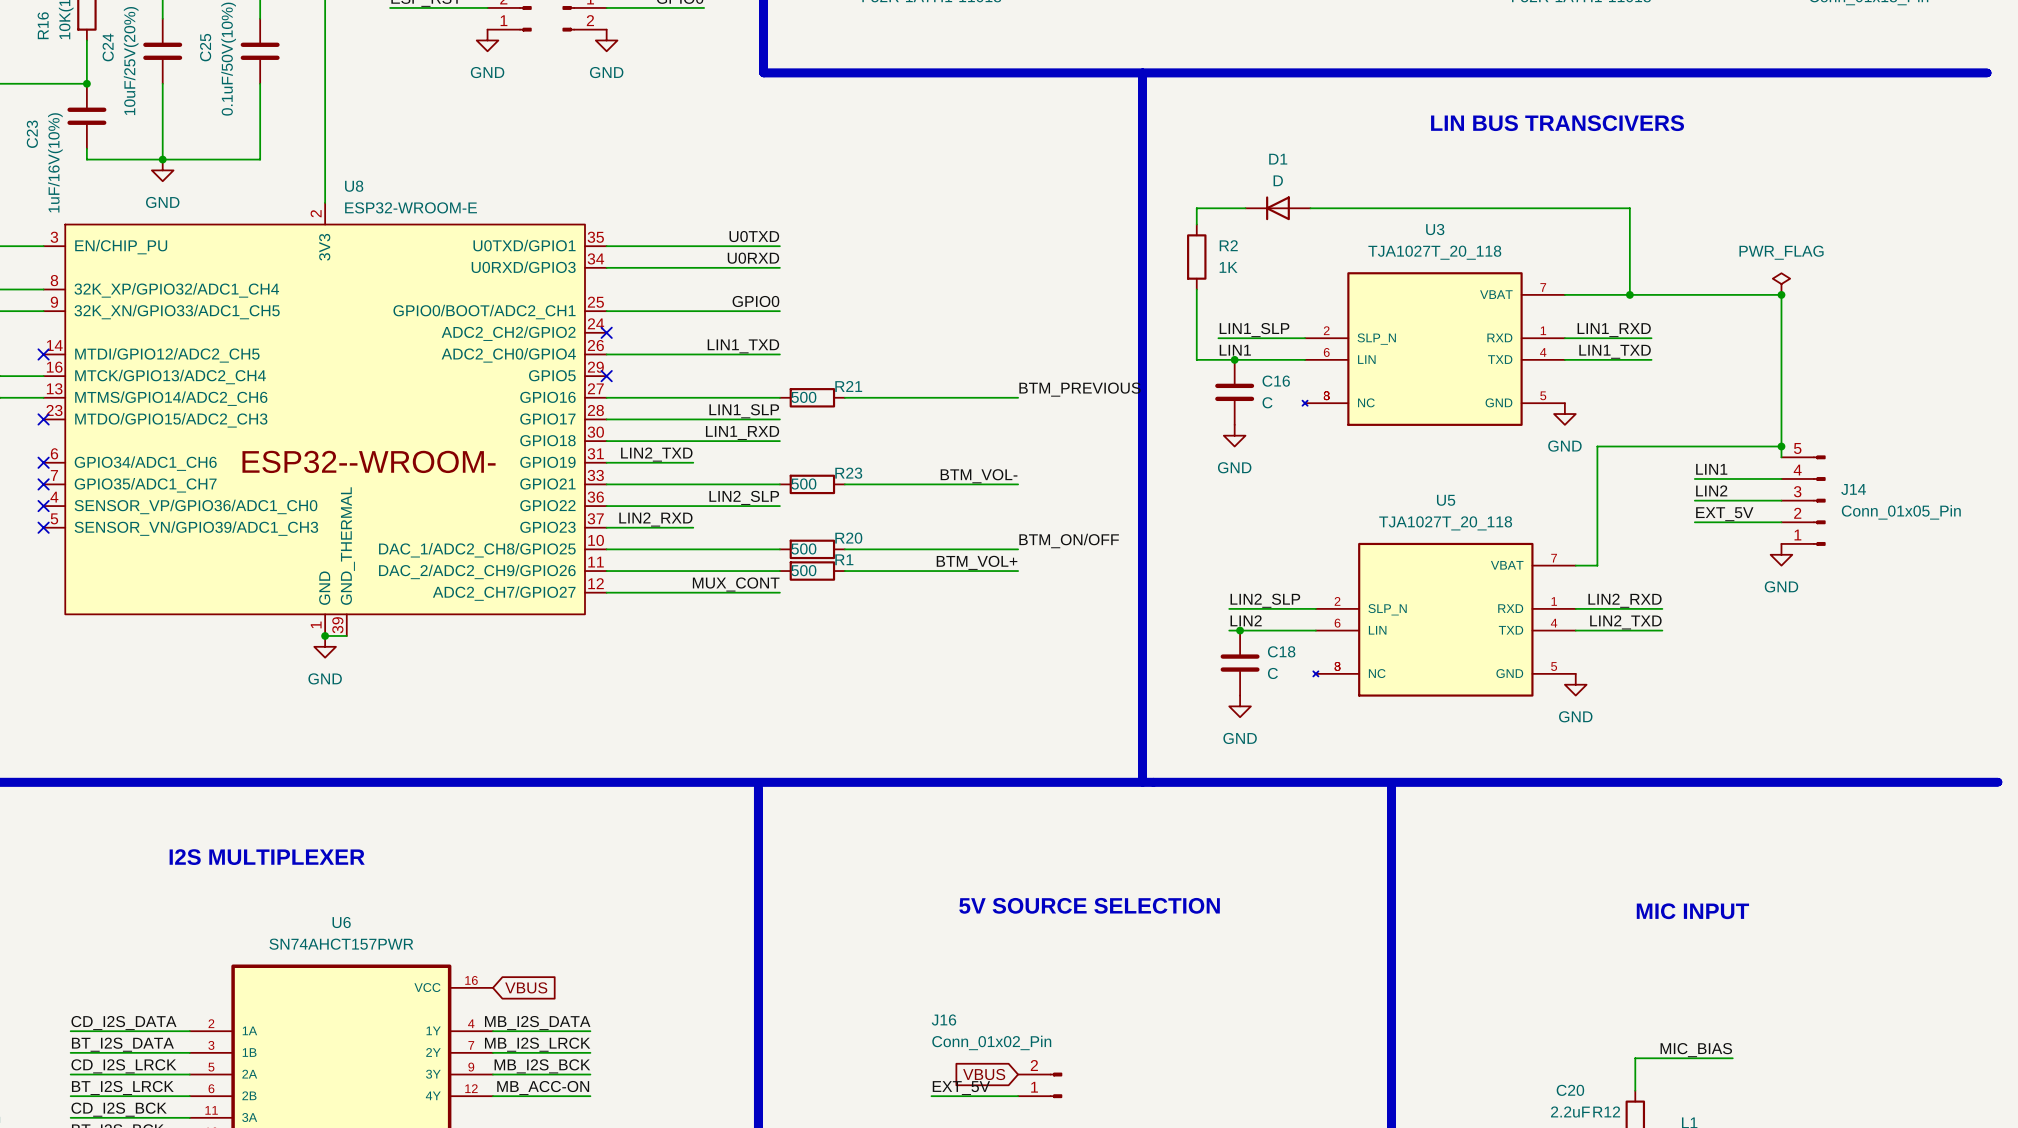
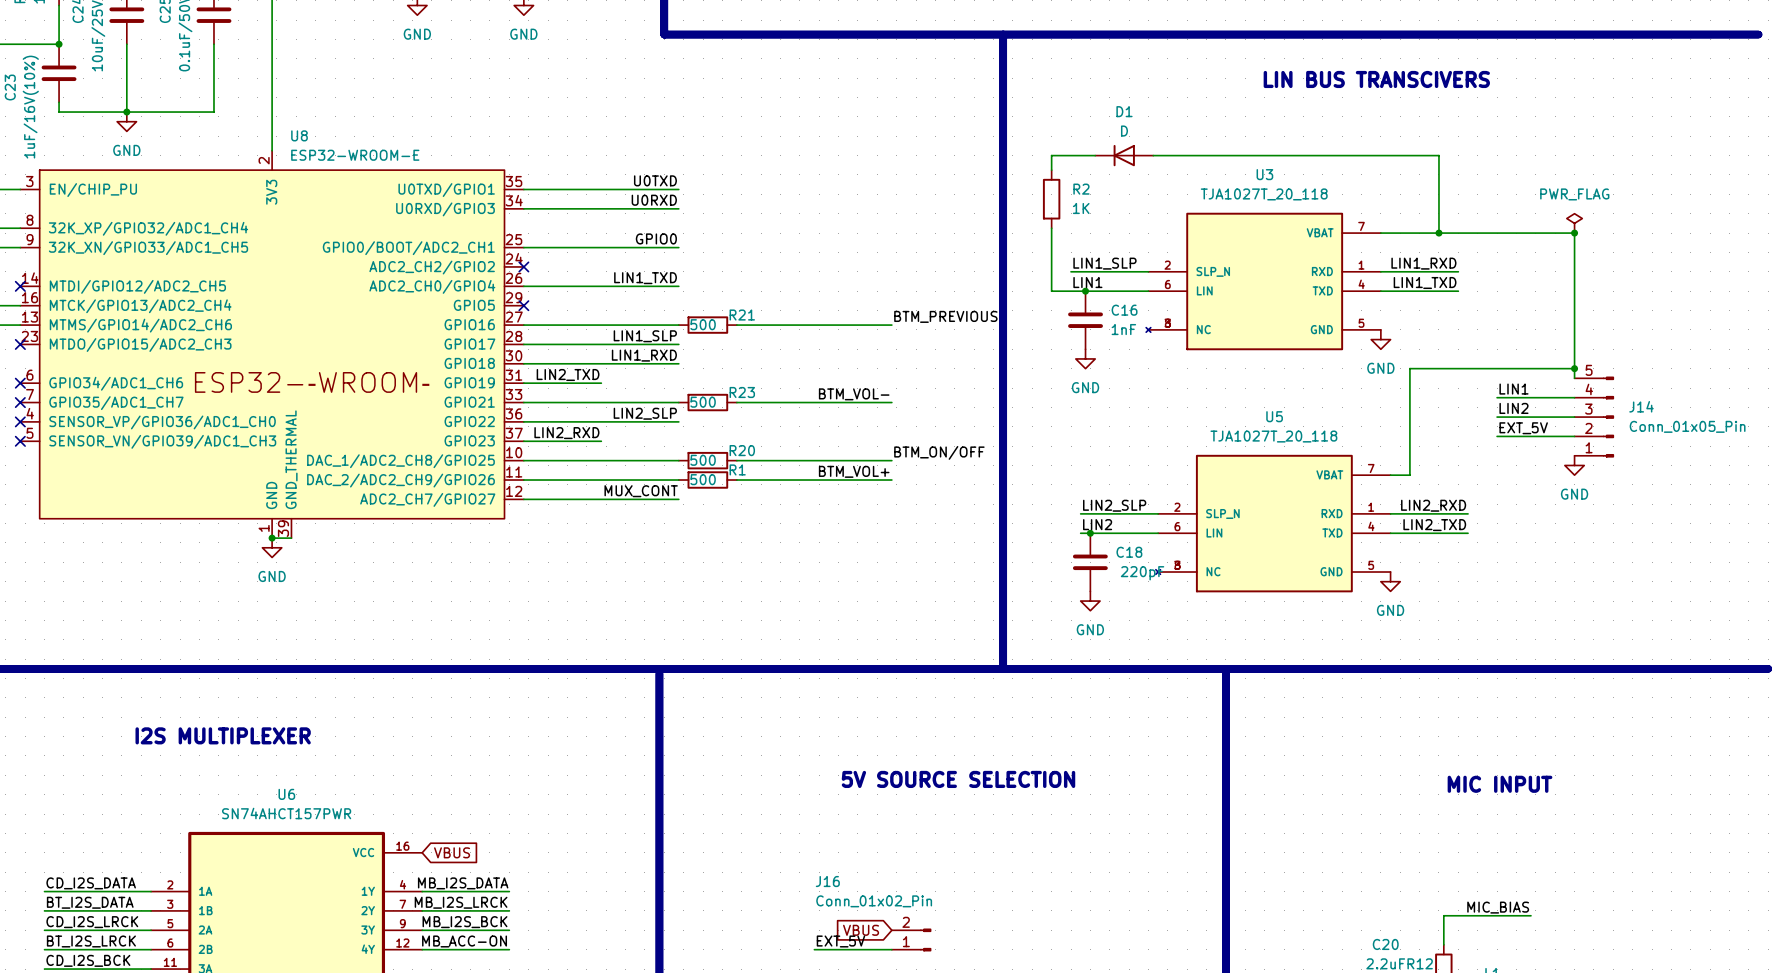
C16 value: C (1267, 402) -> 1nF (1123, 329)
C18 value: C (1272, 673) -> 220pF (1142, 573)

